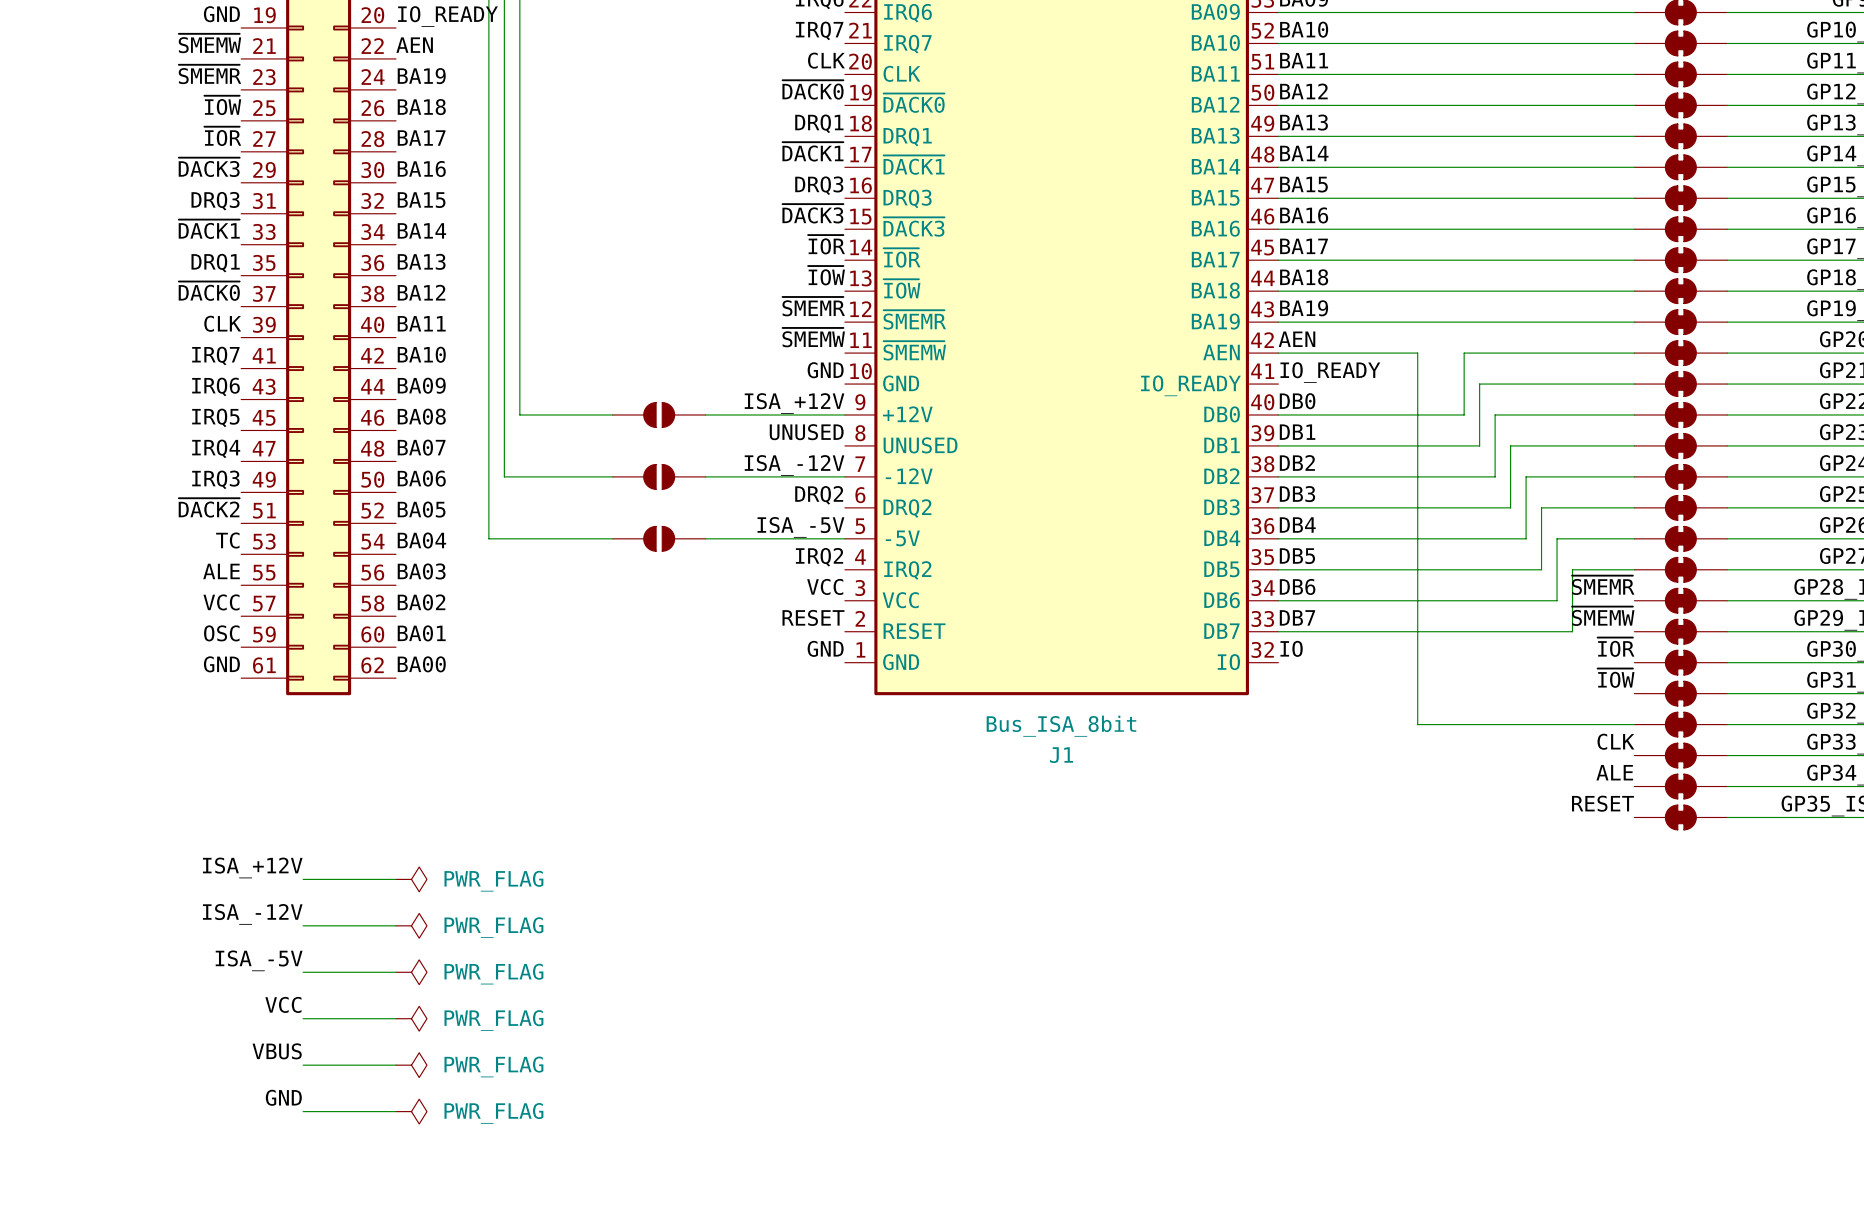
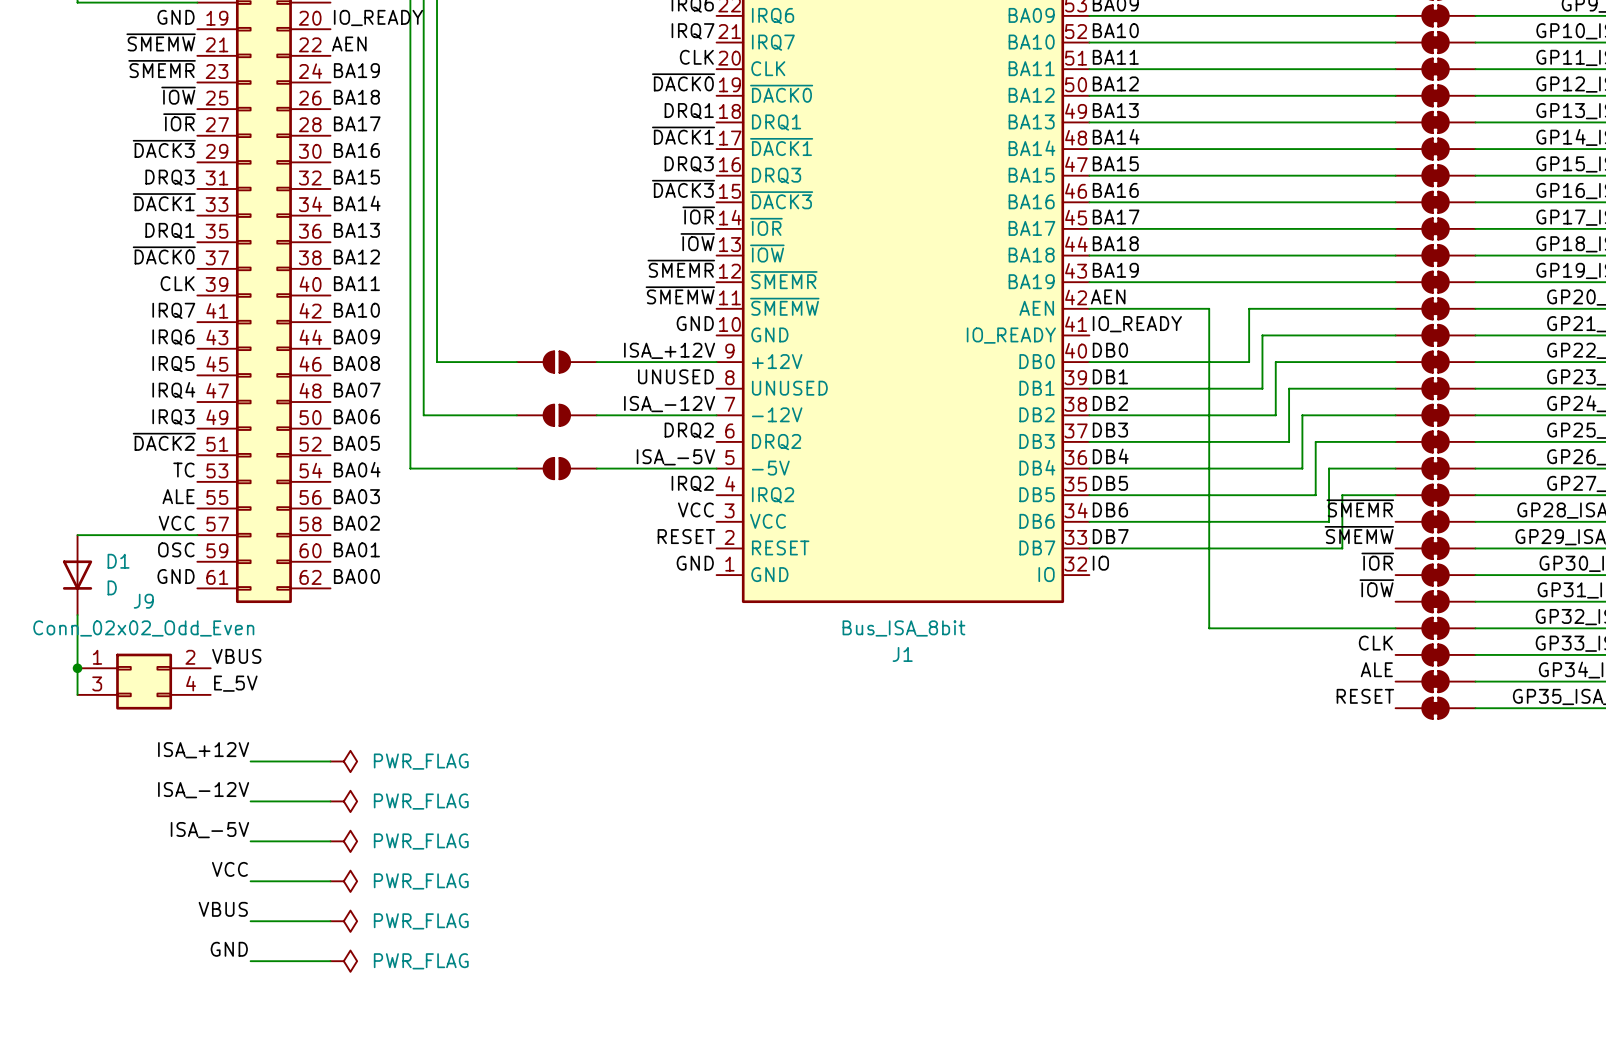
wire: none -> (77, 535) (197, 535)
D1: none -> D (77, 575)
wire: none -> (77, 615) (77, 694)
label: none -> VBUS (236, 656)
junction: none -> (77, 668)
J9: none -> Conn_02x02_Odd_Even (144, 681)
label: none -> E_5V (235, 683)

